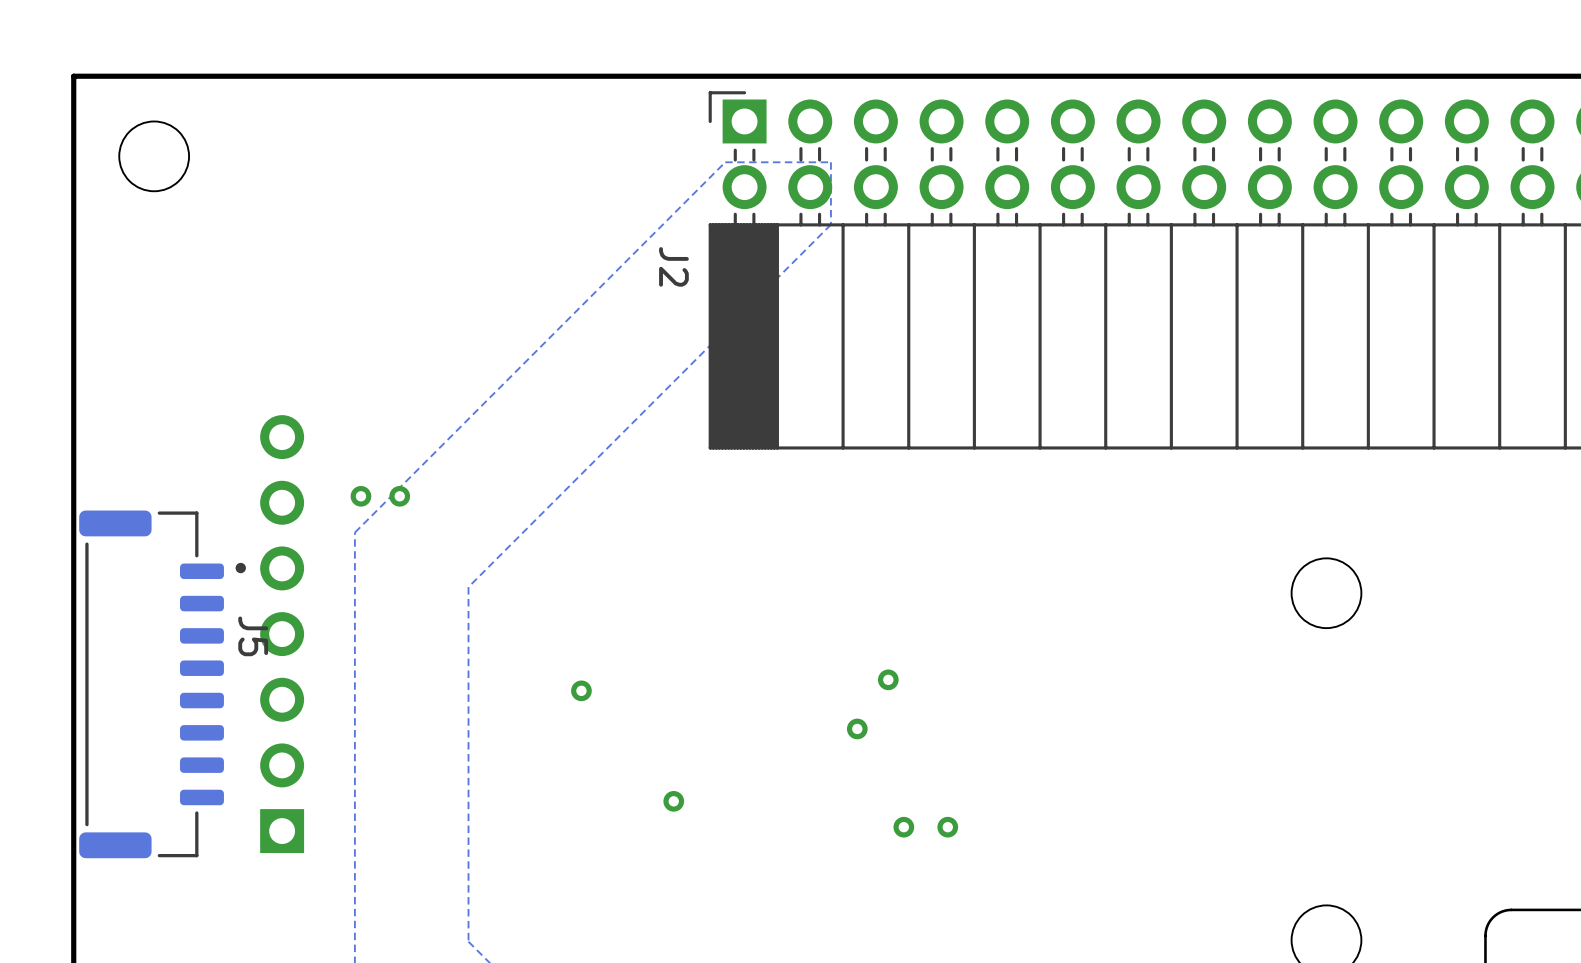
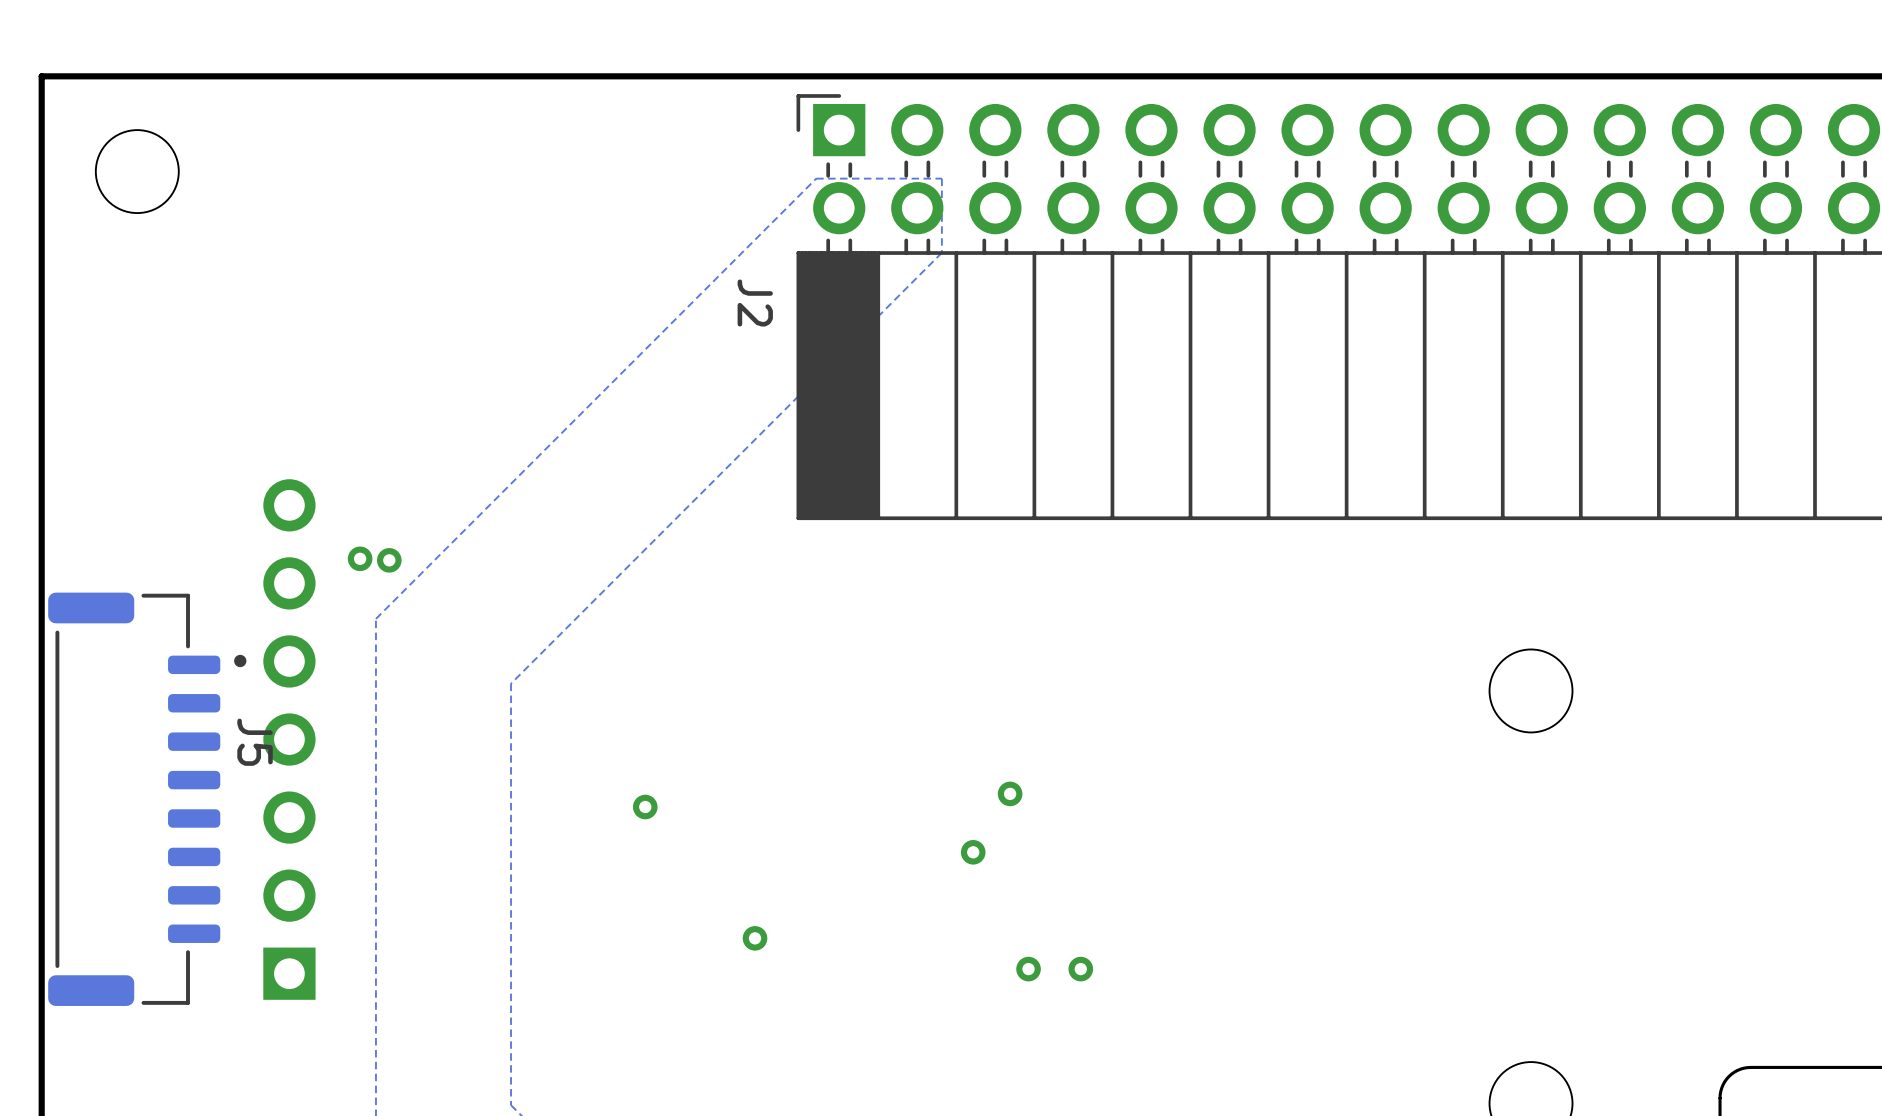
via: none -> (360, 558)
via: none -> (389, 560)
via: (360, 496) -> none
via: (399, 496) -> none

